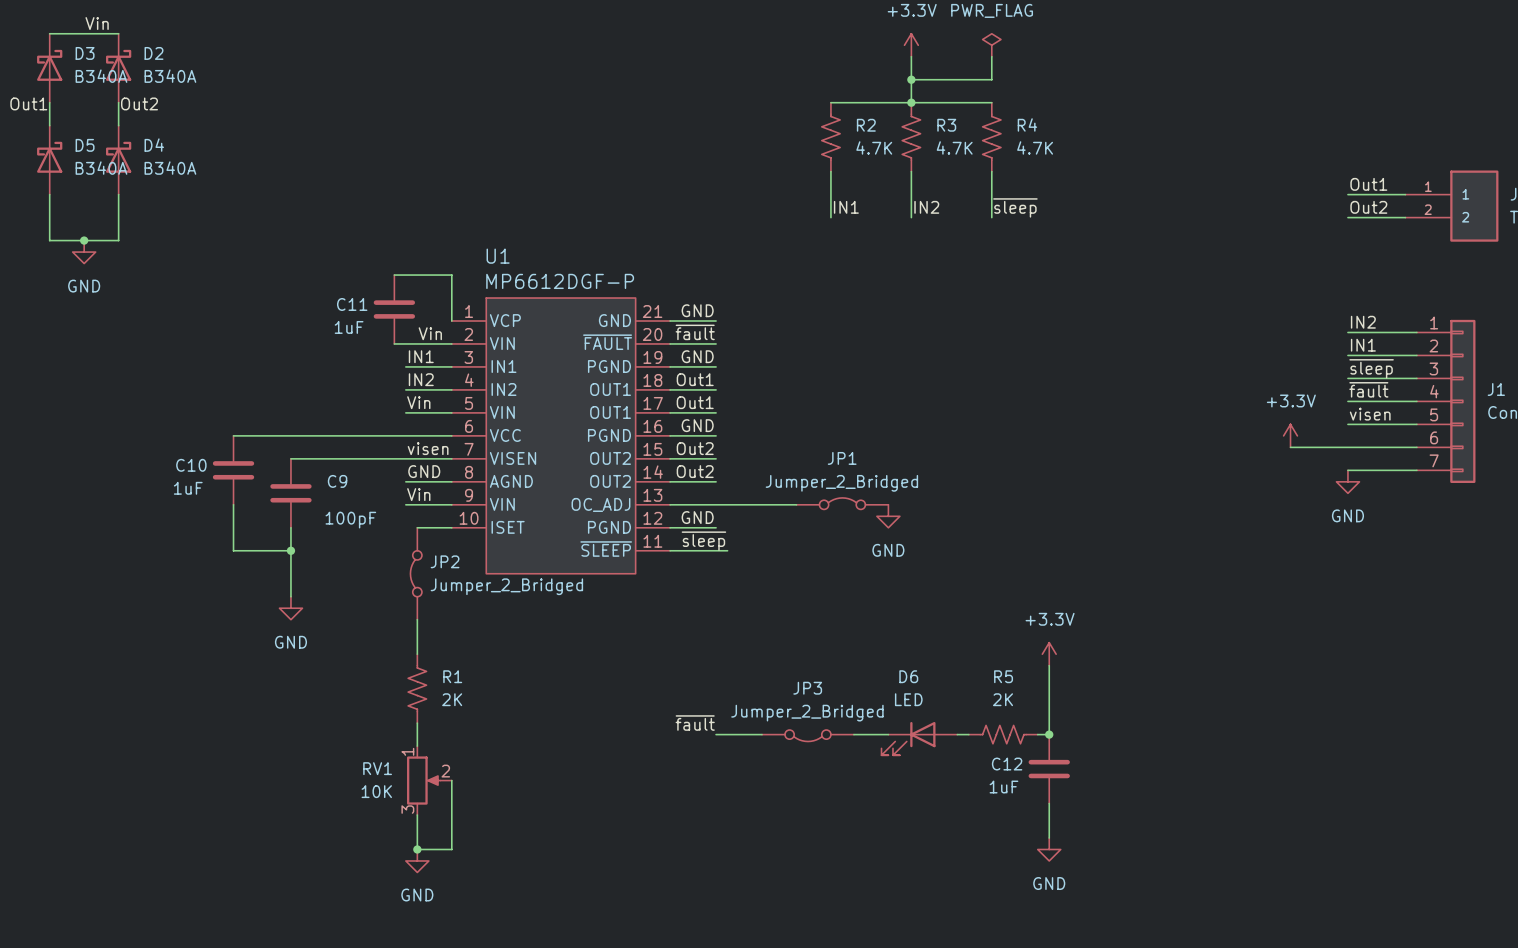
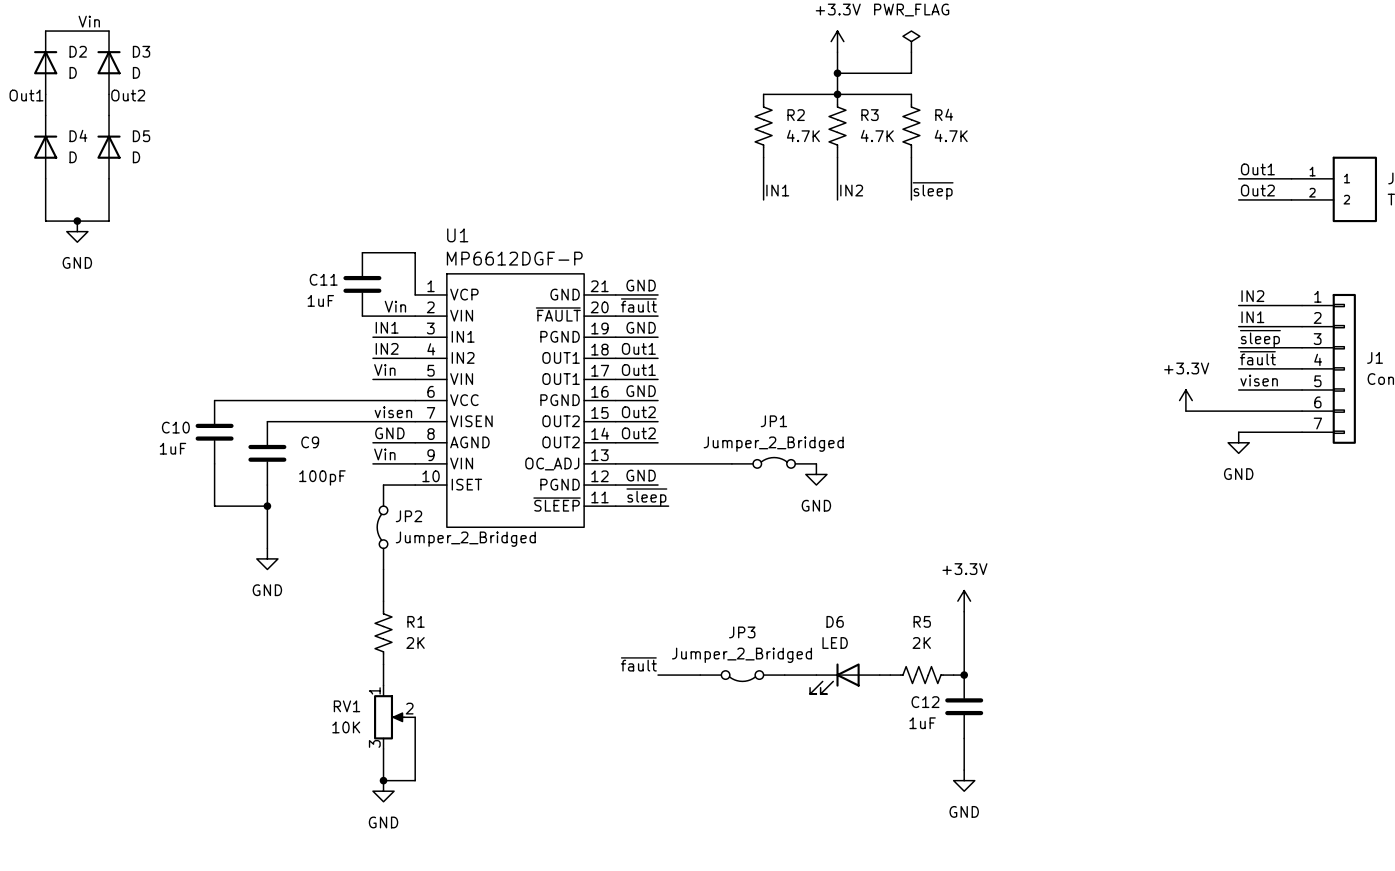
D3 symbol: [37, 33, 63, 103] -> [97, 31, 121, 95]
D2 symbol: [105, 33, 132, 103] -> [34, 31, 58, 95]
D3 value: B340A (101, 76) -> D (136, 72)
D2 value: B340A (170, 76) -> D (73, 72)
D5 symbol: [37, 125, 63, 195] -> [97, 115, 121, 179]
D4 symbol: [105, 125, 132, 195] -> [34, 115, 58, 179]
D5 value: B340A (101, 168) -> D (136, 157)
D4 value: B340A (170, 168) -> D (73, 157)

